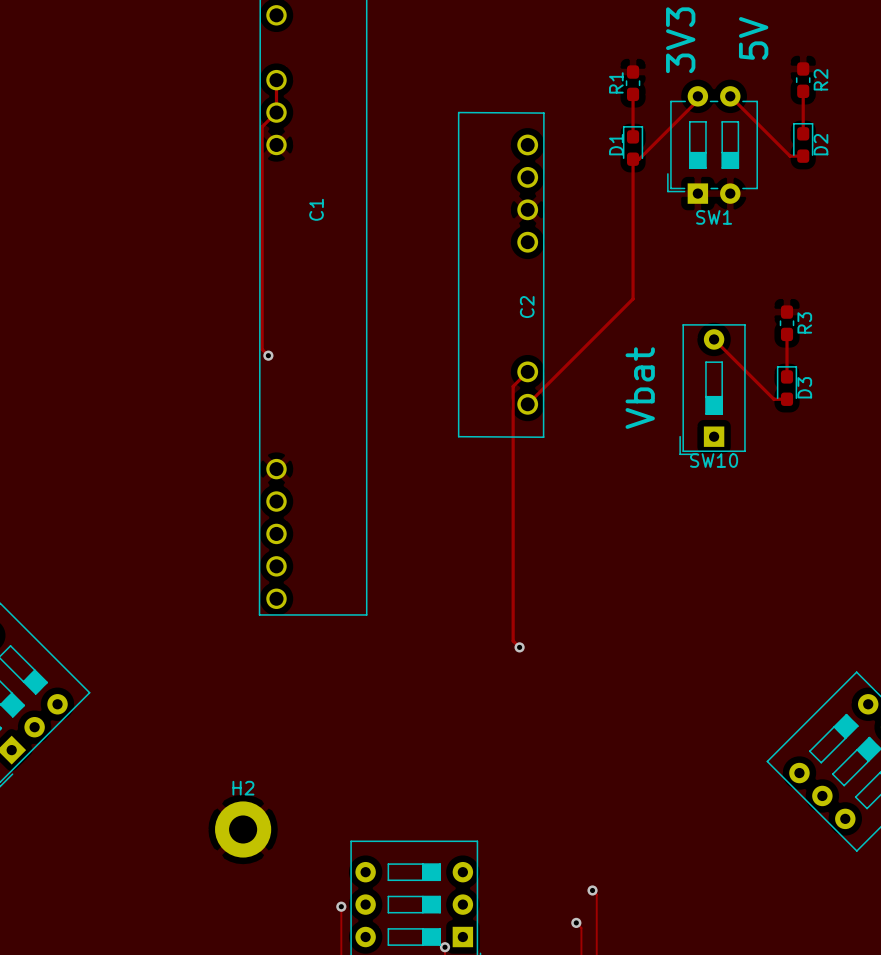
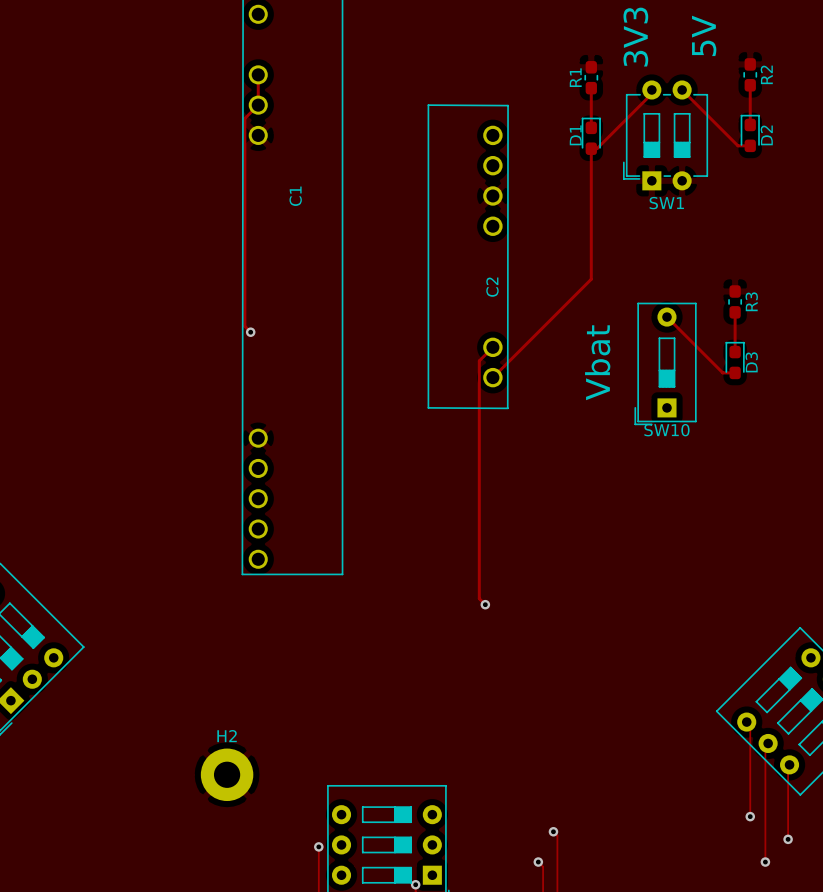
track: none -> (746, 722) (750, 725) (750, 816)
track: none -> (768, 743) (765, 746) (765, 862)
track: none -> (789, 764) (788, 839)
via: none -> (750, 816)
via: none -> (788, 839)
via: none -> (765, 862)

